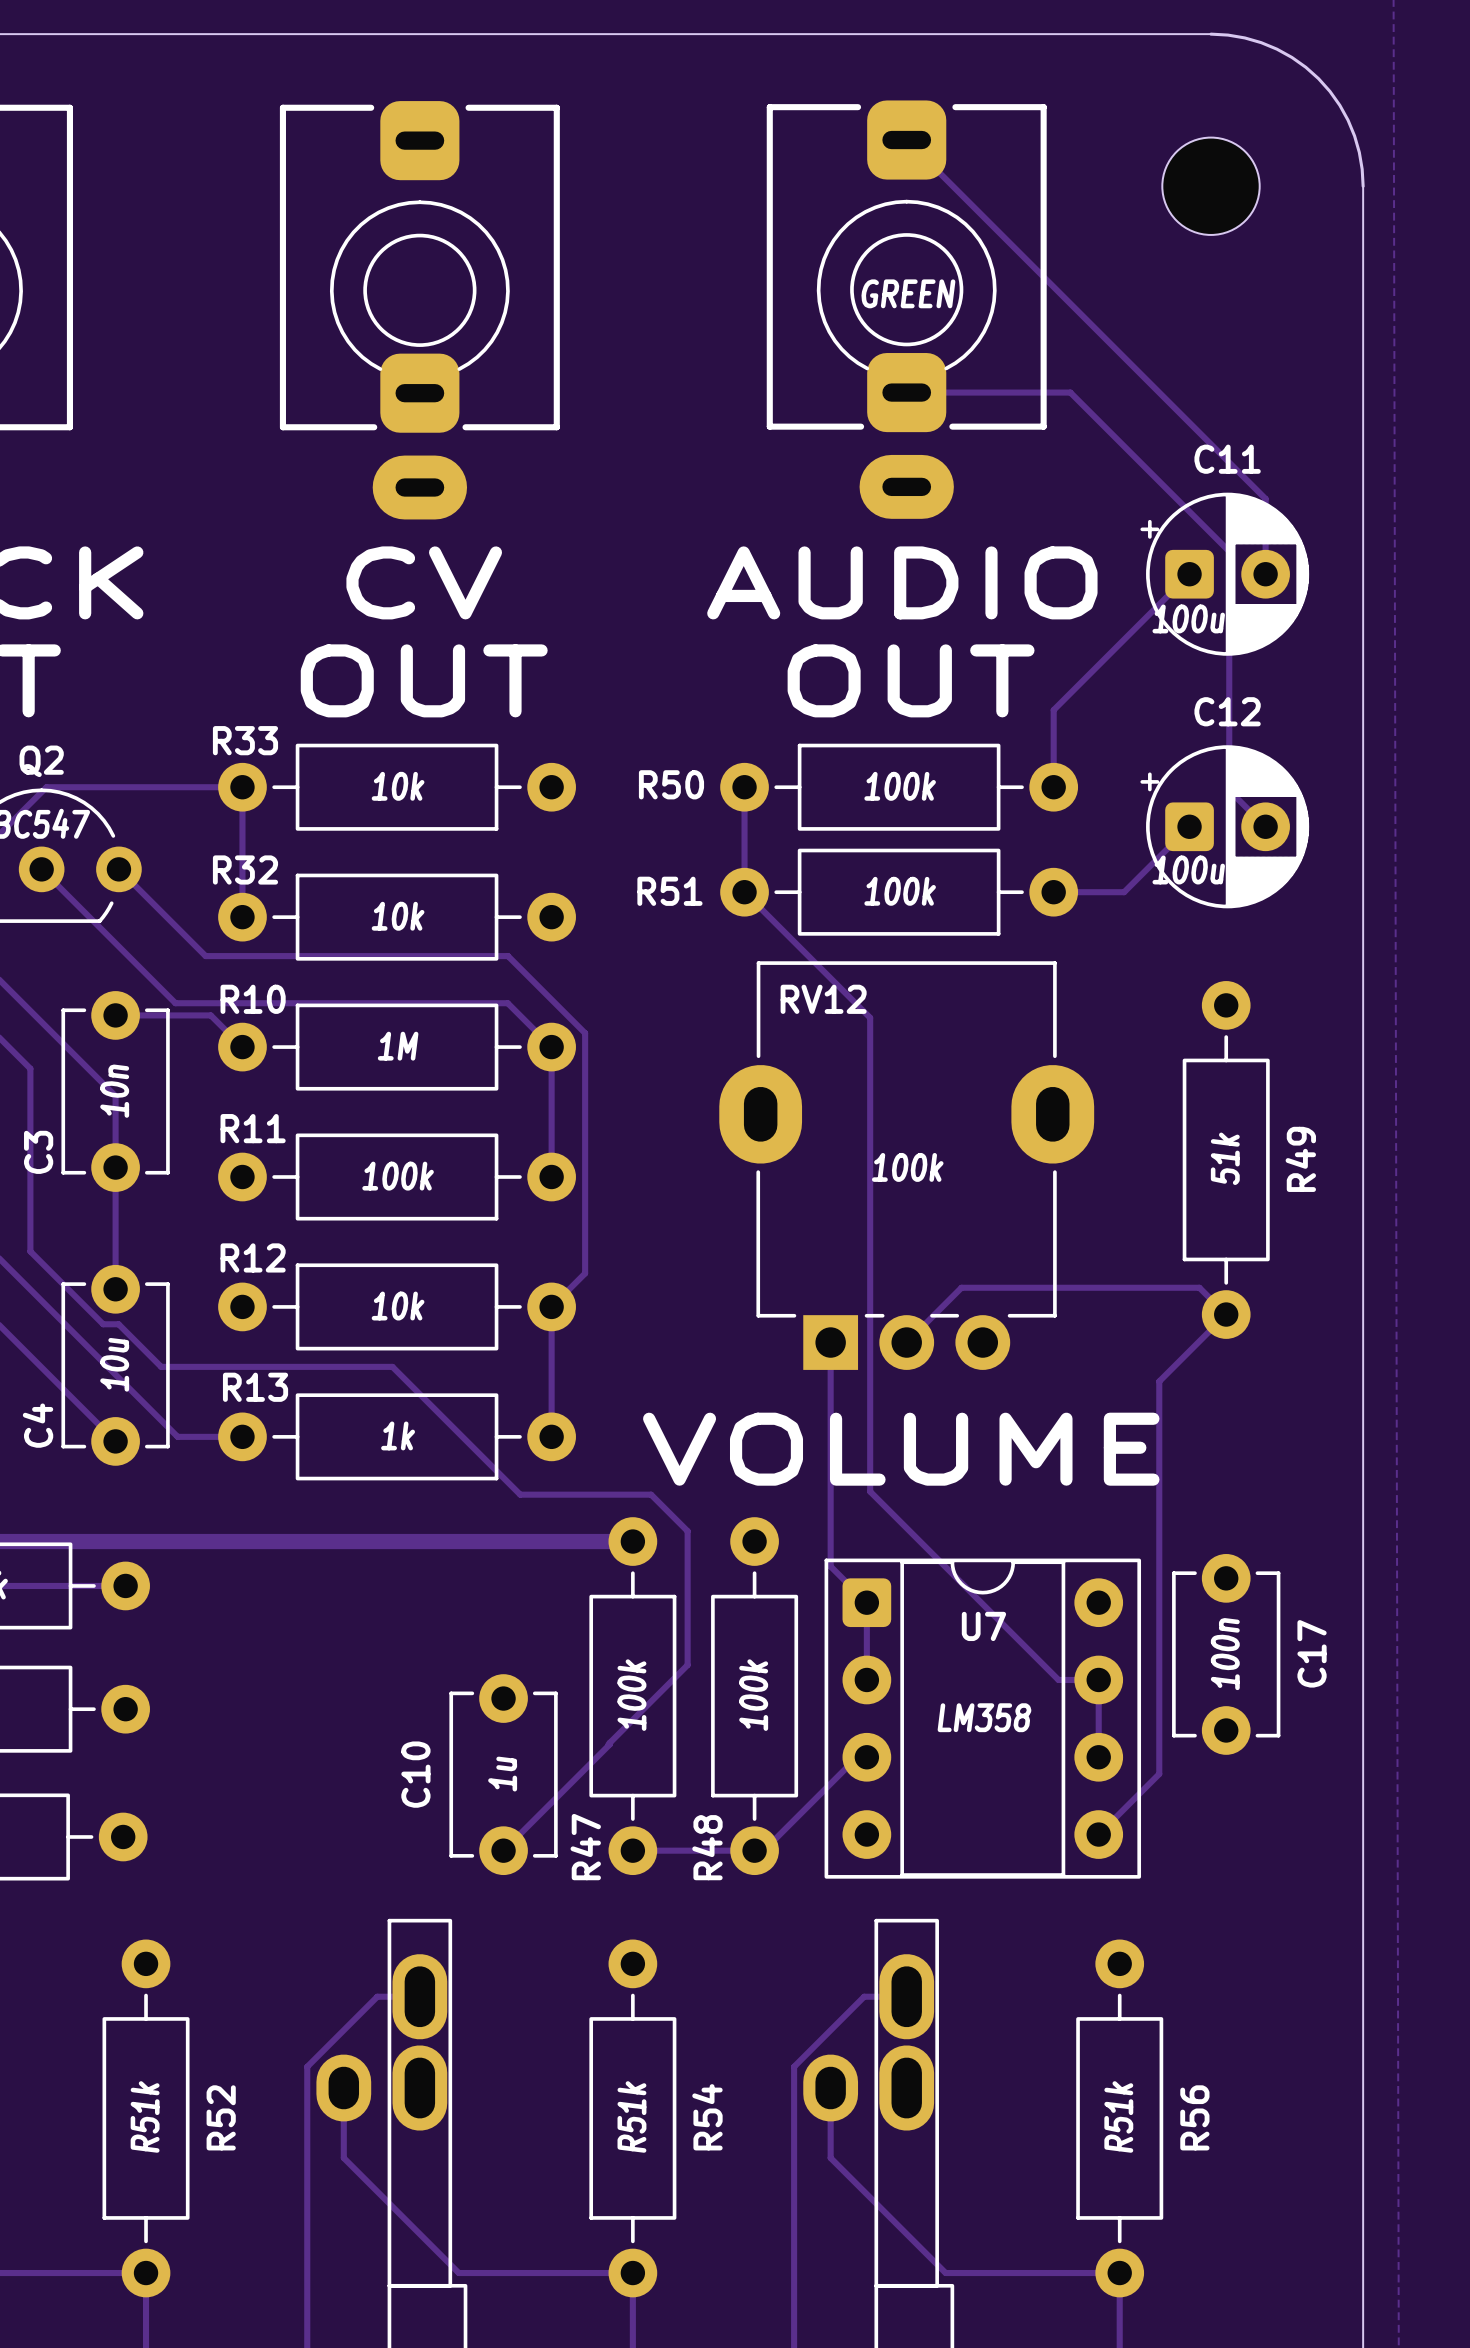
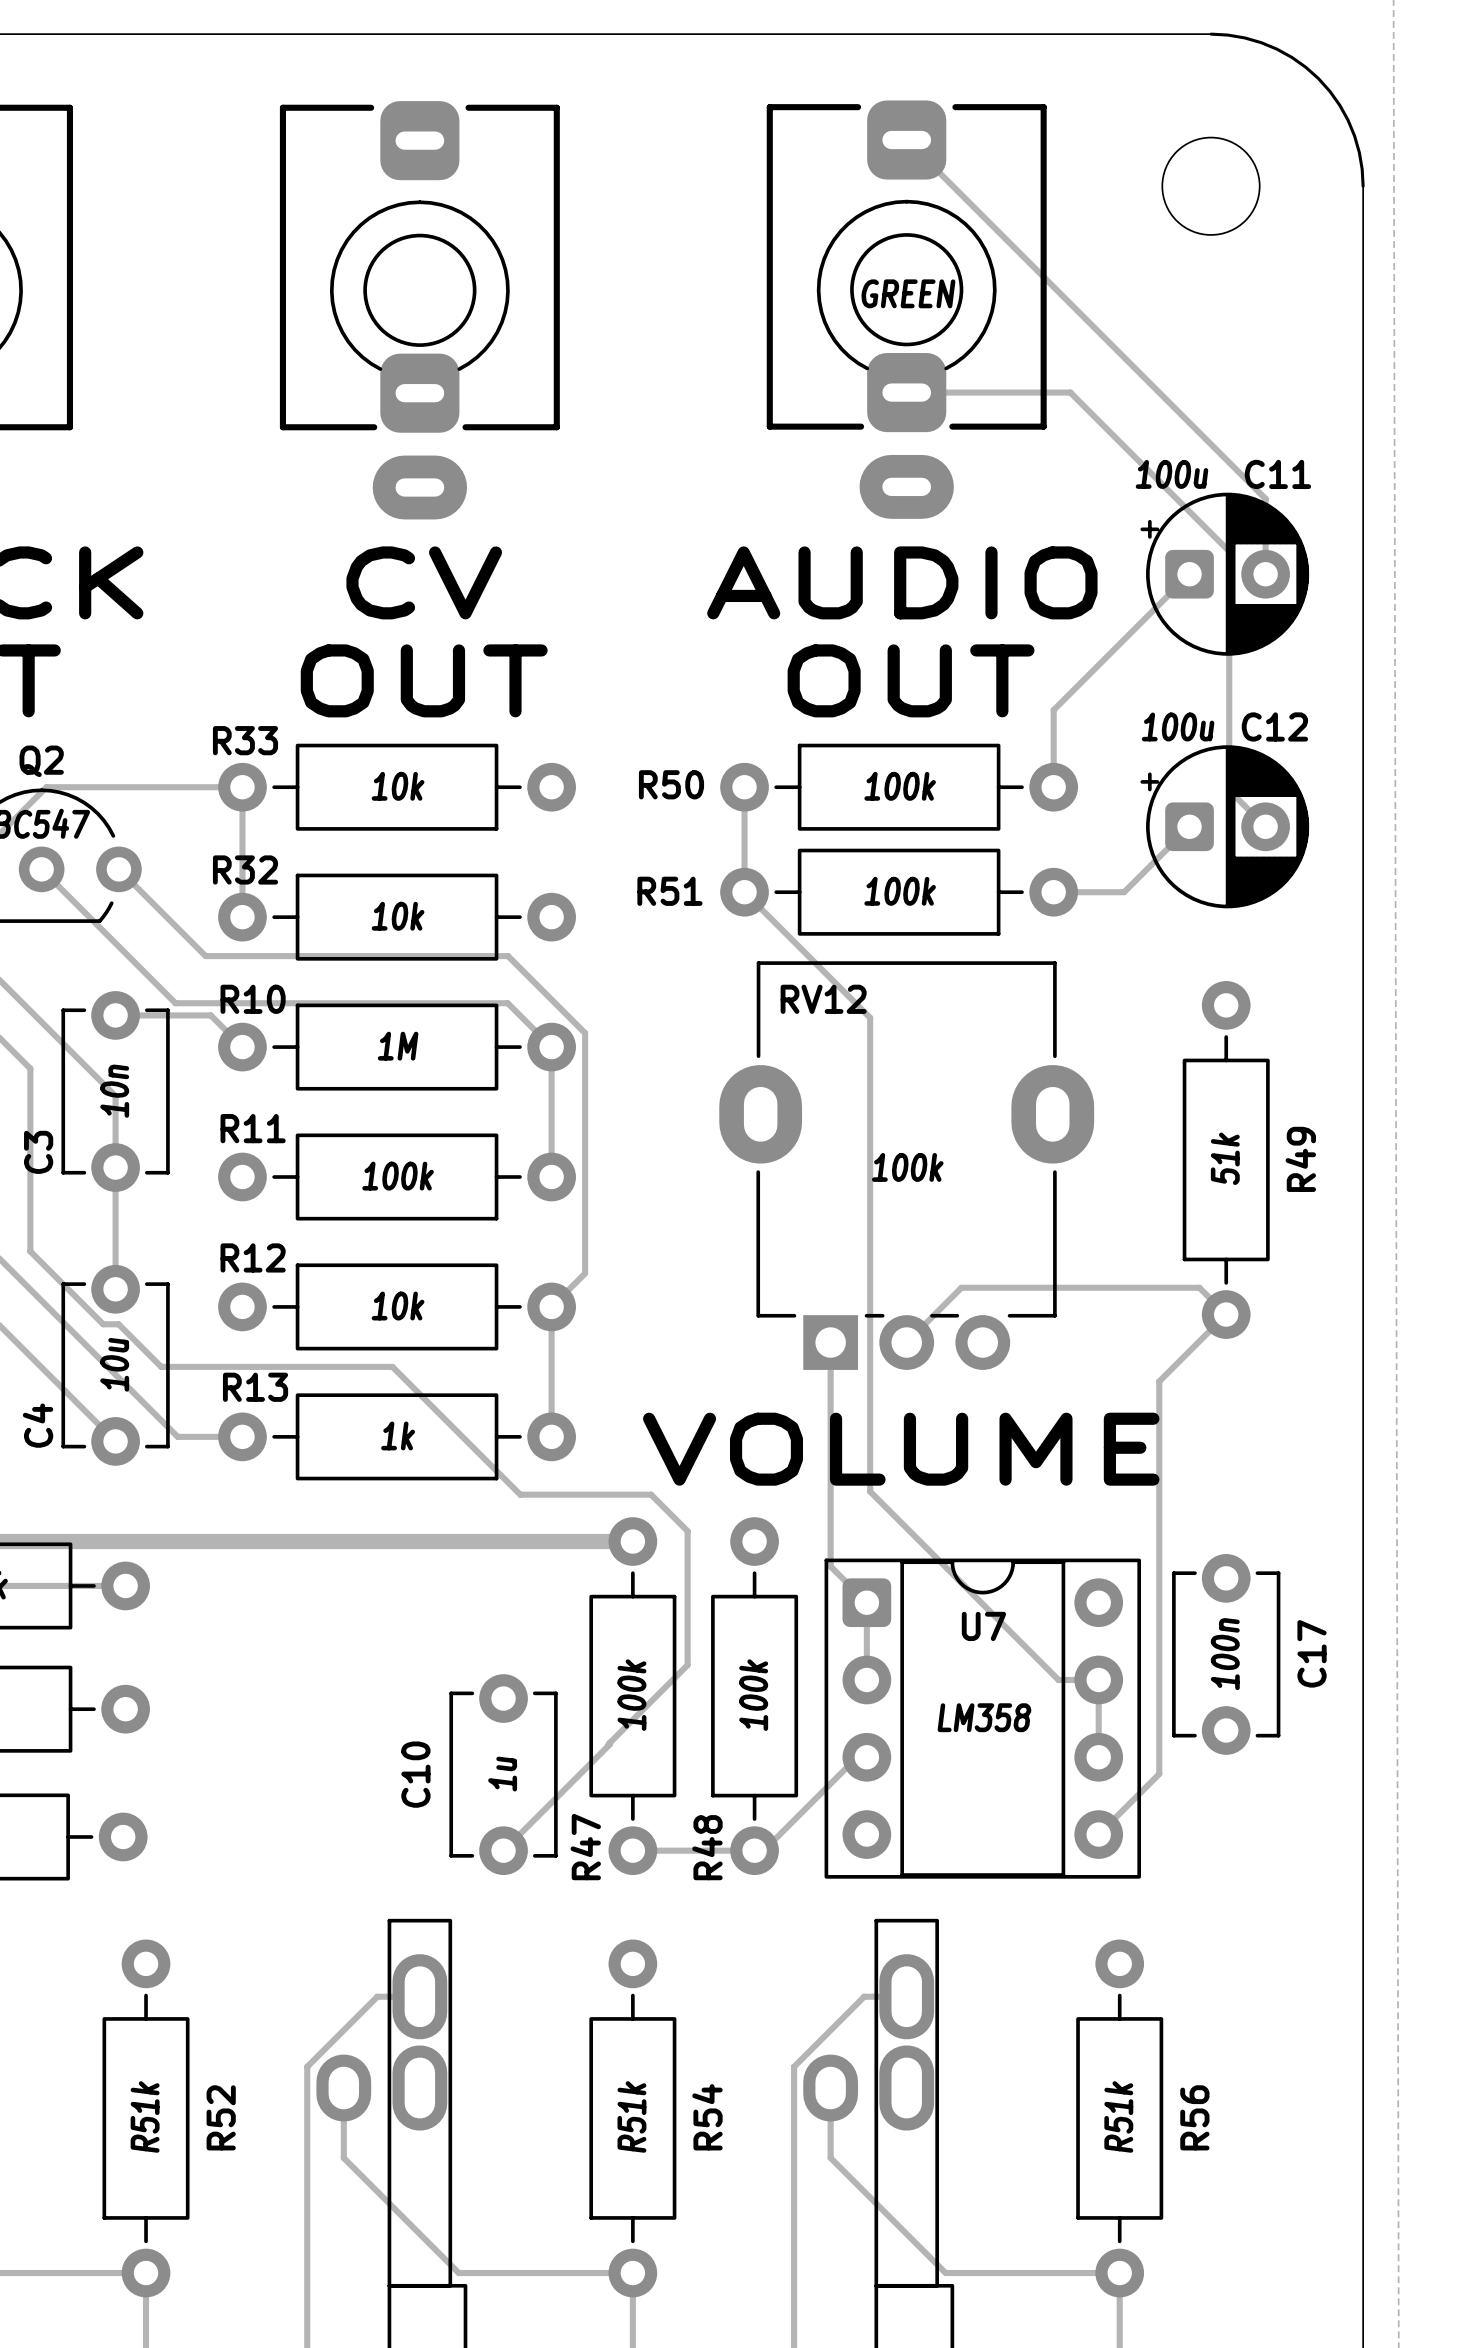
C11 name position: C11 (1227, 459) -> C11 (1277, 474)
C11 value position: 100u (1188, 618) -> 100u (1171, 474)
C12 name position: C12 (1227, 711) -> C12 (1274, 726)
C12 value position: 100u (1188, 869) -> 100u (1178, 726)

